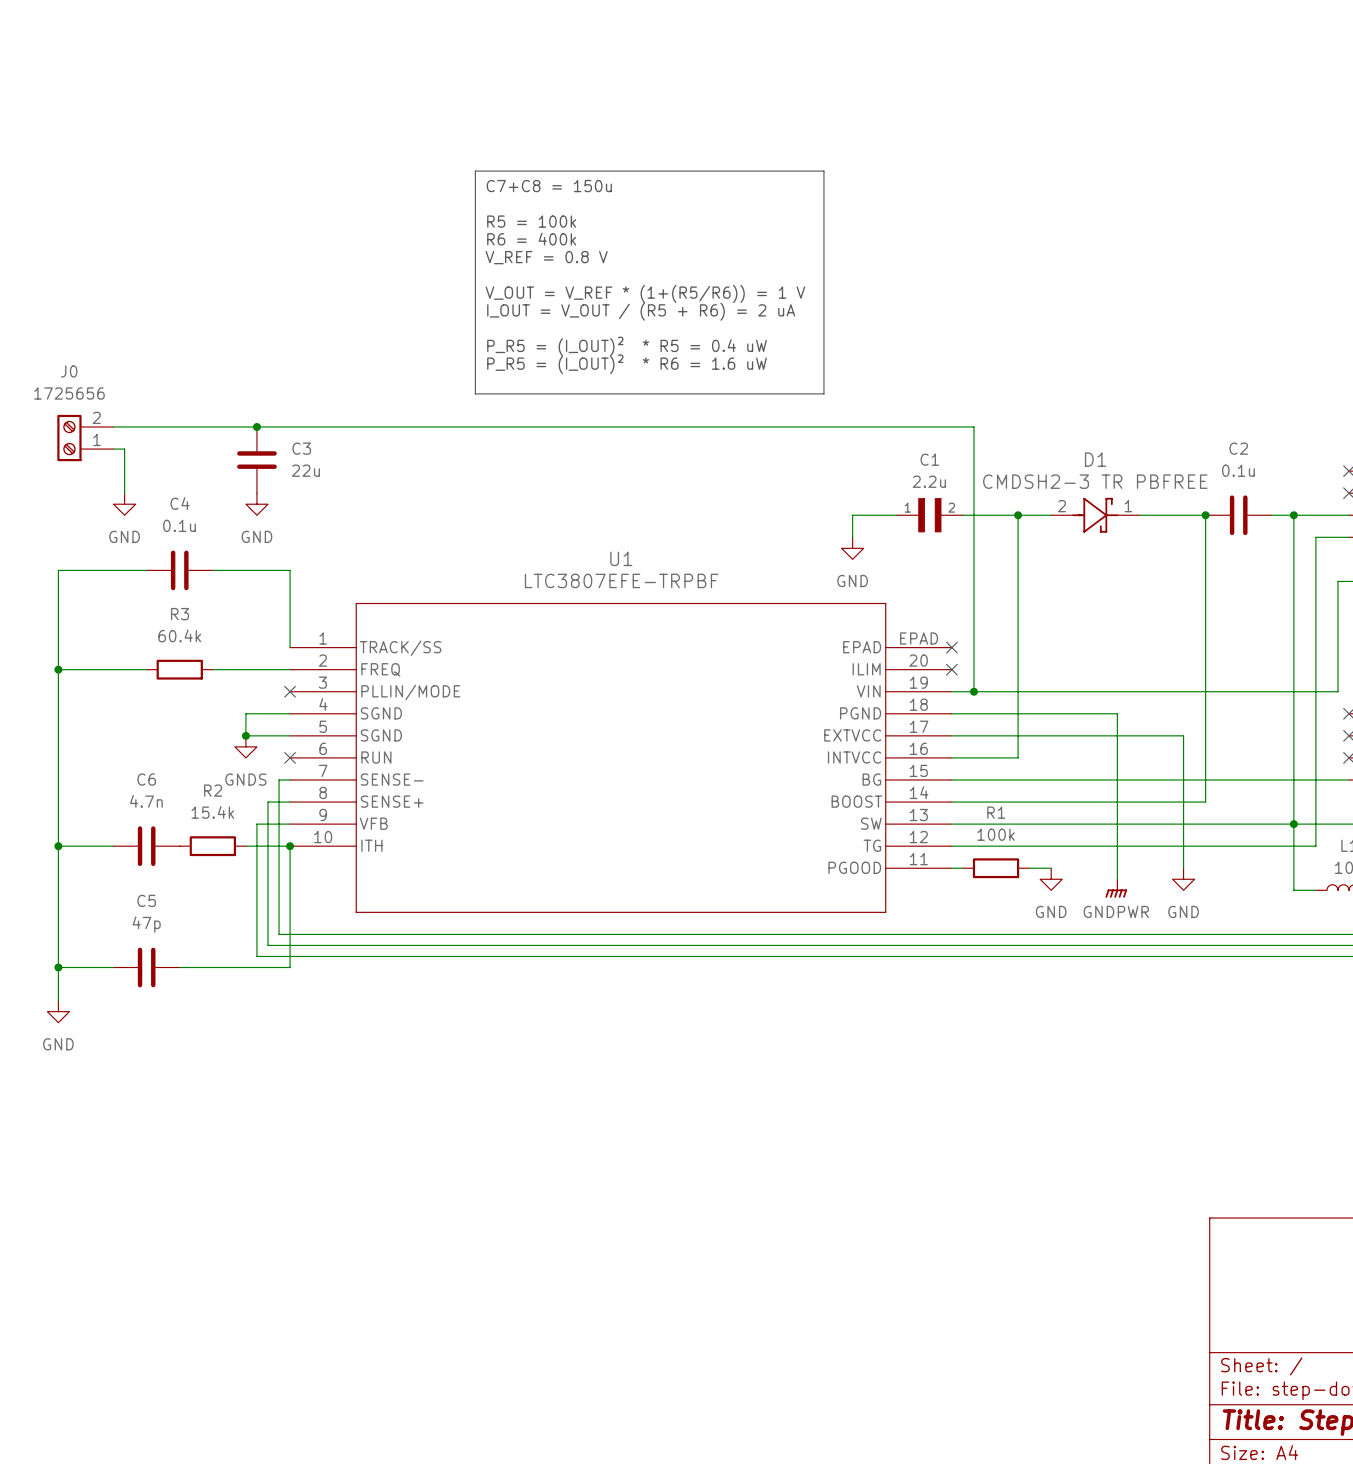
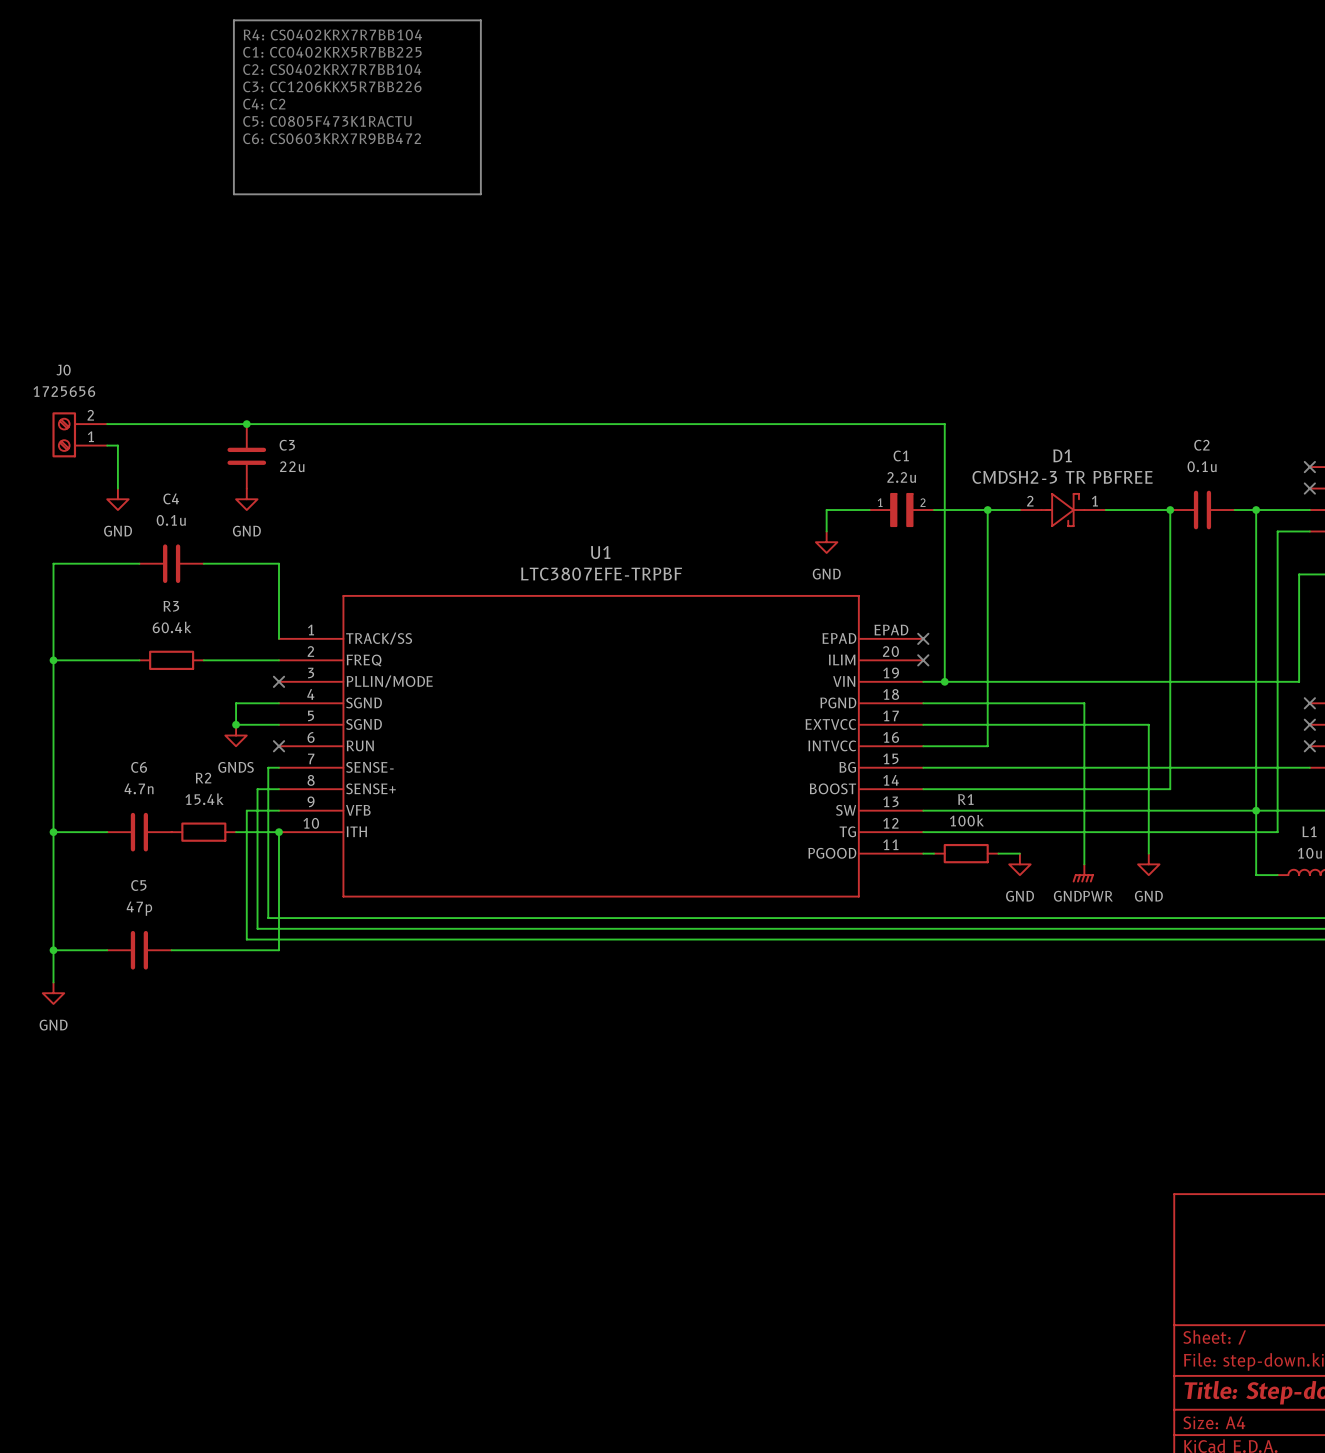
line: none -> (233, 20) (480, 20) (480, 194) (233, 194) (233, 20)
text: none -> R4: CS0402KRX7R7BB104 (332, 34)
text: none -> C1: CC0402KRX5R7BB225 (332, 52)
text: none -> C2: CS0402KRX7R7BB104 (332, 69)
text: none -> C3: CC1206KKX5R7BB226 (332, 86)
text: none -> C4: C2 (264, 104)
text: none -> C5: C0805F473K1RACTU (327, 121)
text: none -> C6: CS0603KRX7R9BB472 (332, 138)
line: (475, 171) (823, 171) (823, 393) (475, 393) (475, 171) -> none
text: C7+C8 = 150u (549, 186) -> none
text: R5 = 100k (531, 221) -> none
text: R6 = 400k (531, 239) -> none
text: V_REF = 0.8 V (546, 257) -> none
text: V_OUT = V_REF * (1+(R5/R6)) = 1 V (645, 293) -> none
text: I_OUT = V_OUT / (R5 + R6) = 2 uA (641, 311) -> none
text: P_R5 = (I_OUT)² * R5 = 0.4 uW (627, 346) -> none
text: P_R5 = (I_OUT)² * R6 = 1.6 uW (627, 364) -> none

